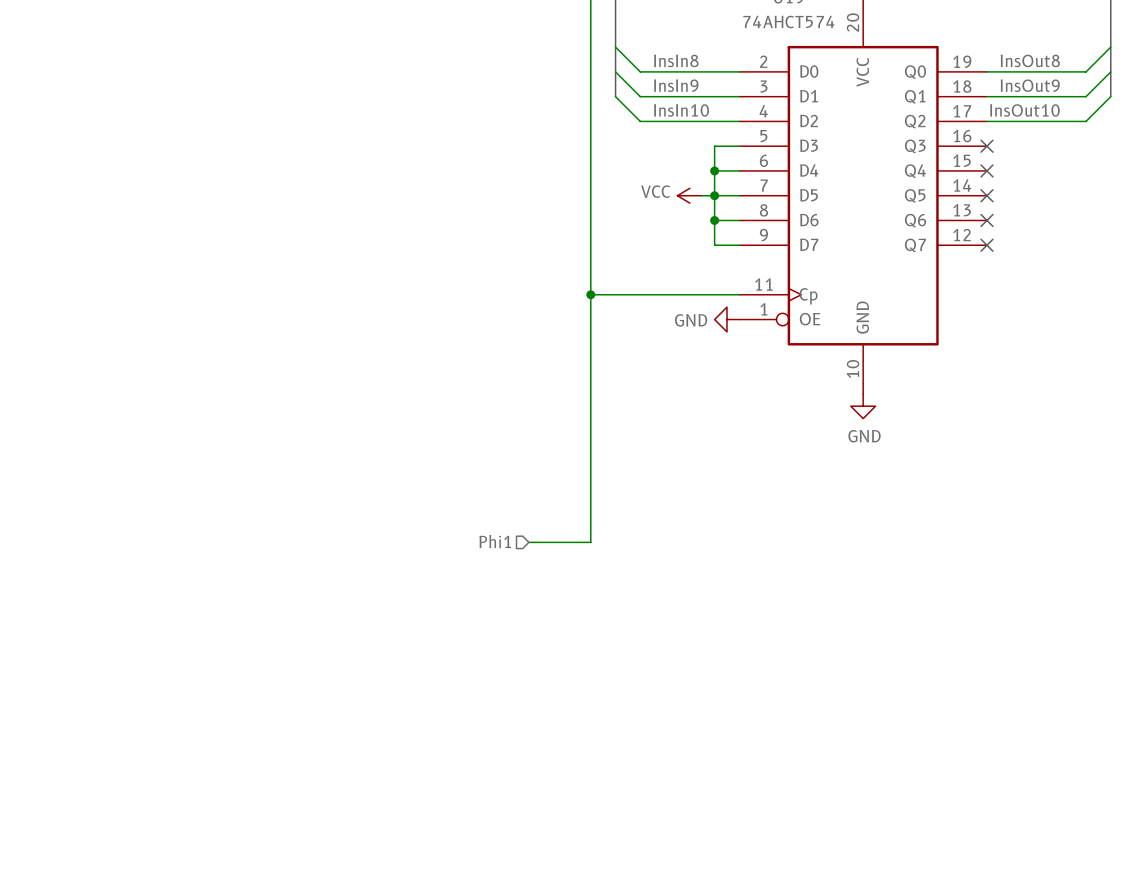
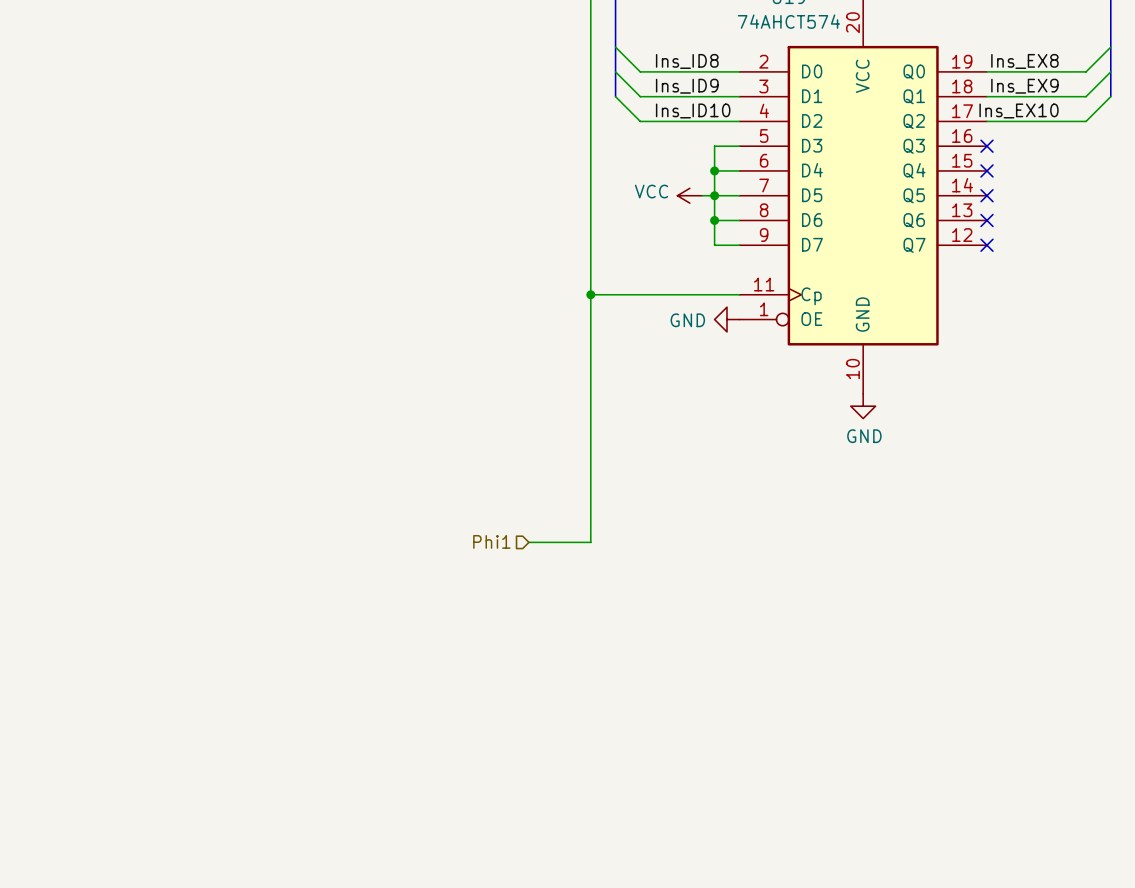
label: InsIn8 (676, 60) -> Ins_ID8 (687, 61)
label: InsOut8 (1030, 60) -> Ins_EX8 (1024, 61)
label: InsIn9 (676, 85) -> Ins_ID9 (687, 86)
label: InsOut9 (1030, 85) -> Ins_EX9 (1024, 86)
label: InsIn10 (681, 110) -> Ins_ID10 (693, 110)
label: InsOut10 (1024, 110) -> Ins_EX10 (1019, 110)

